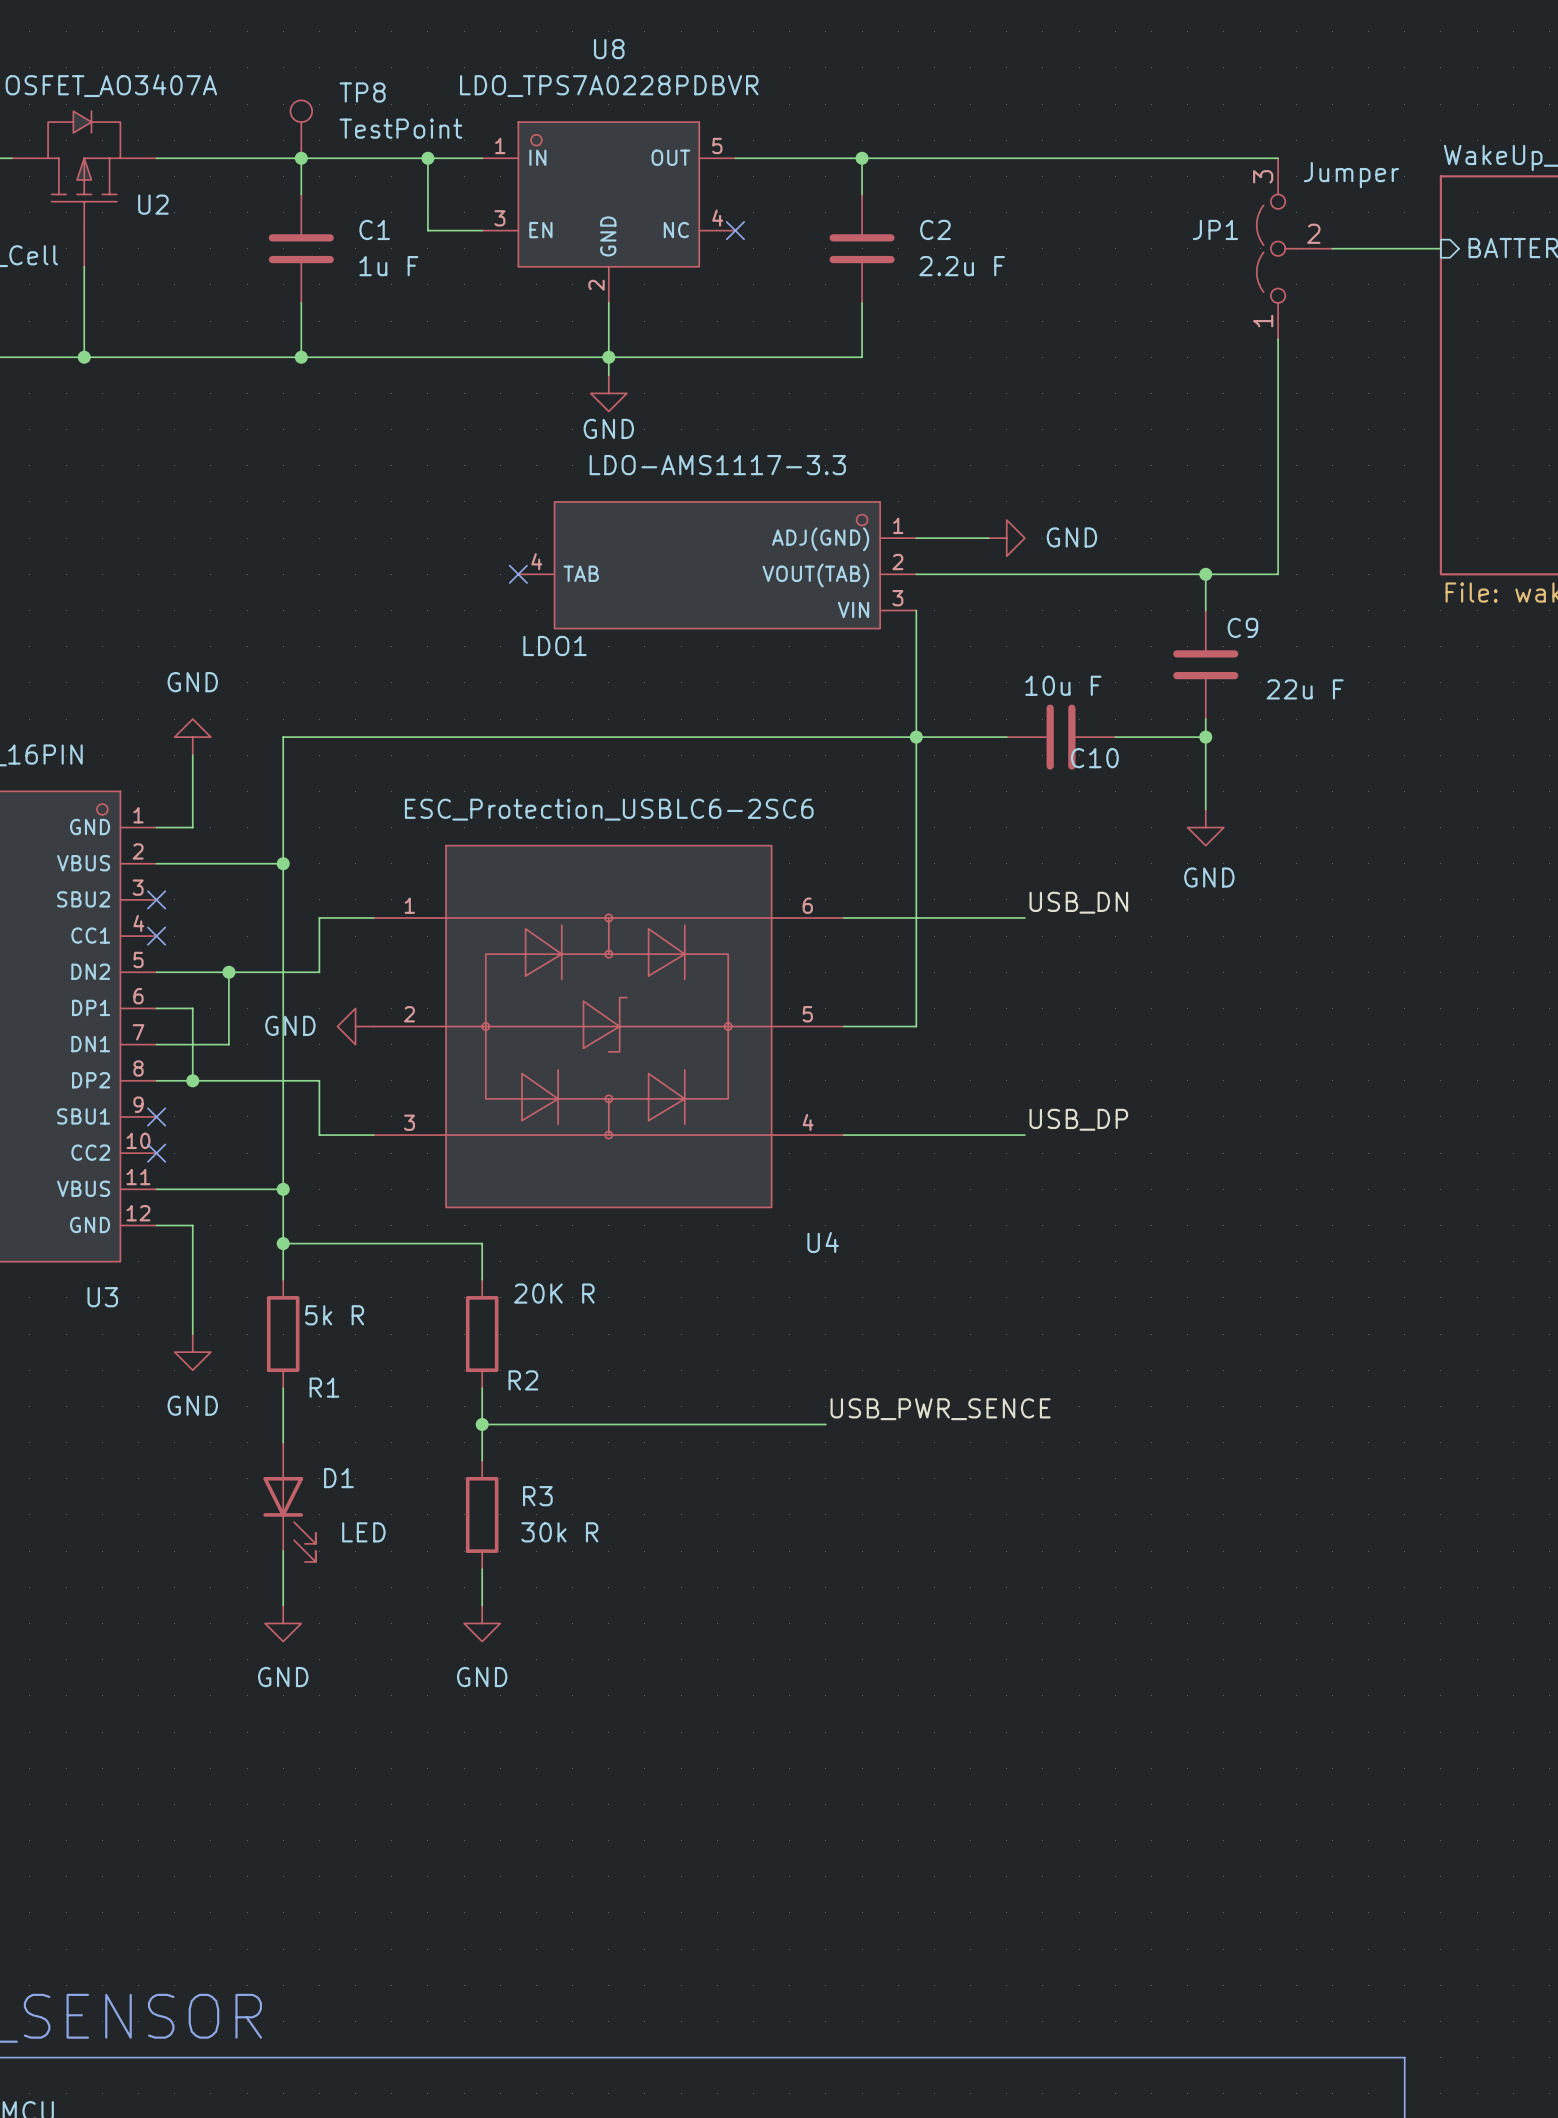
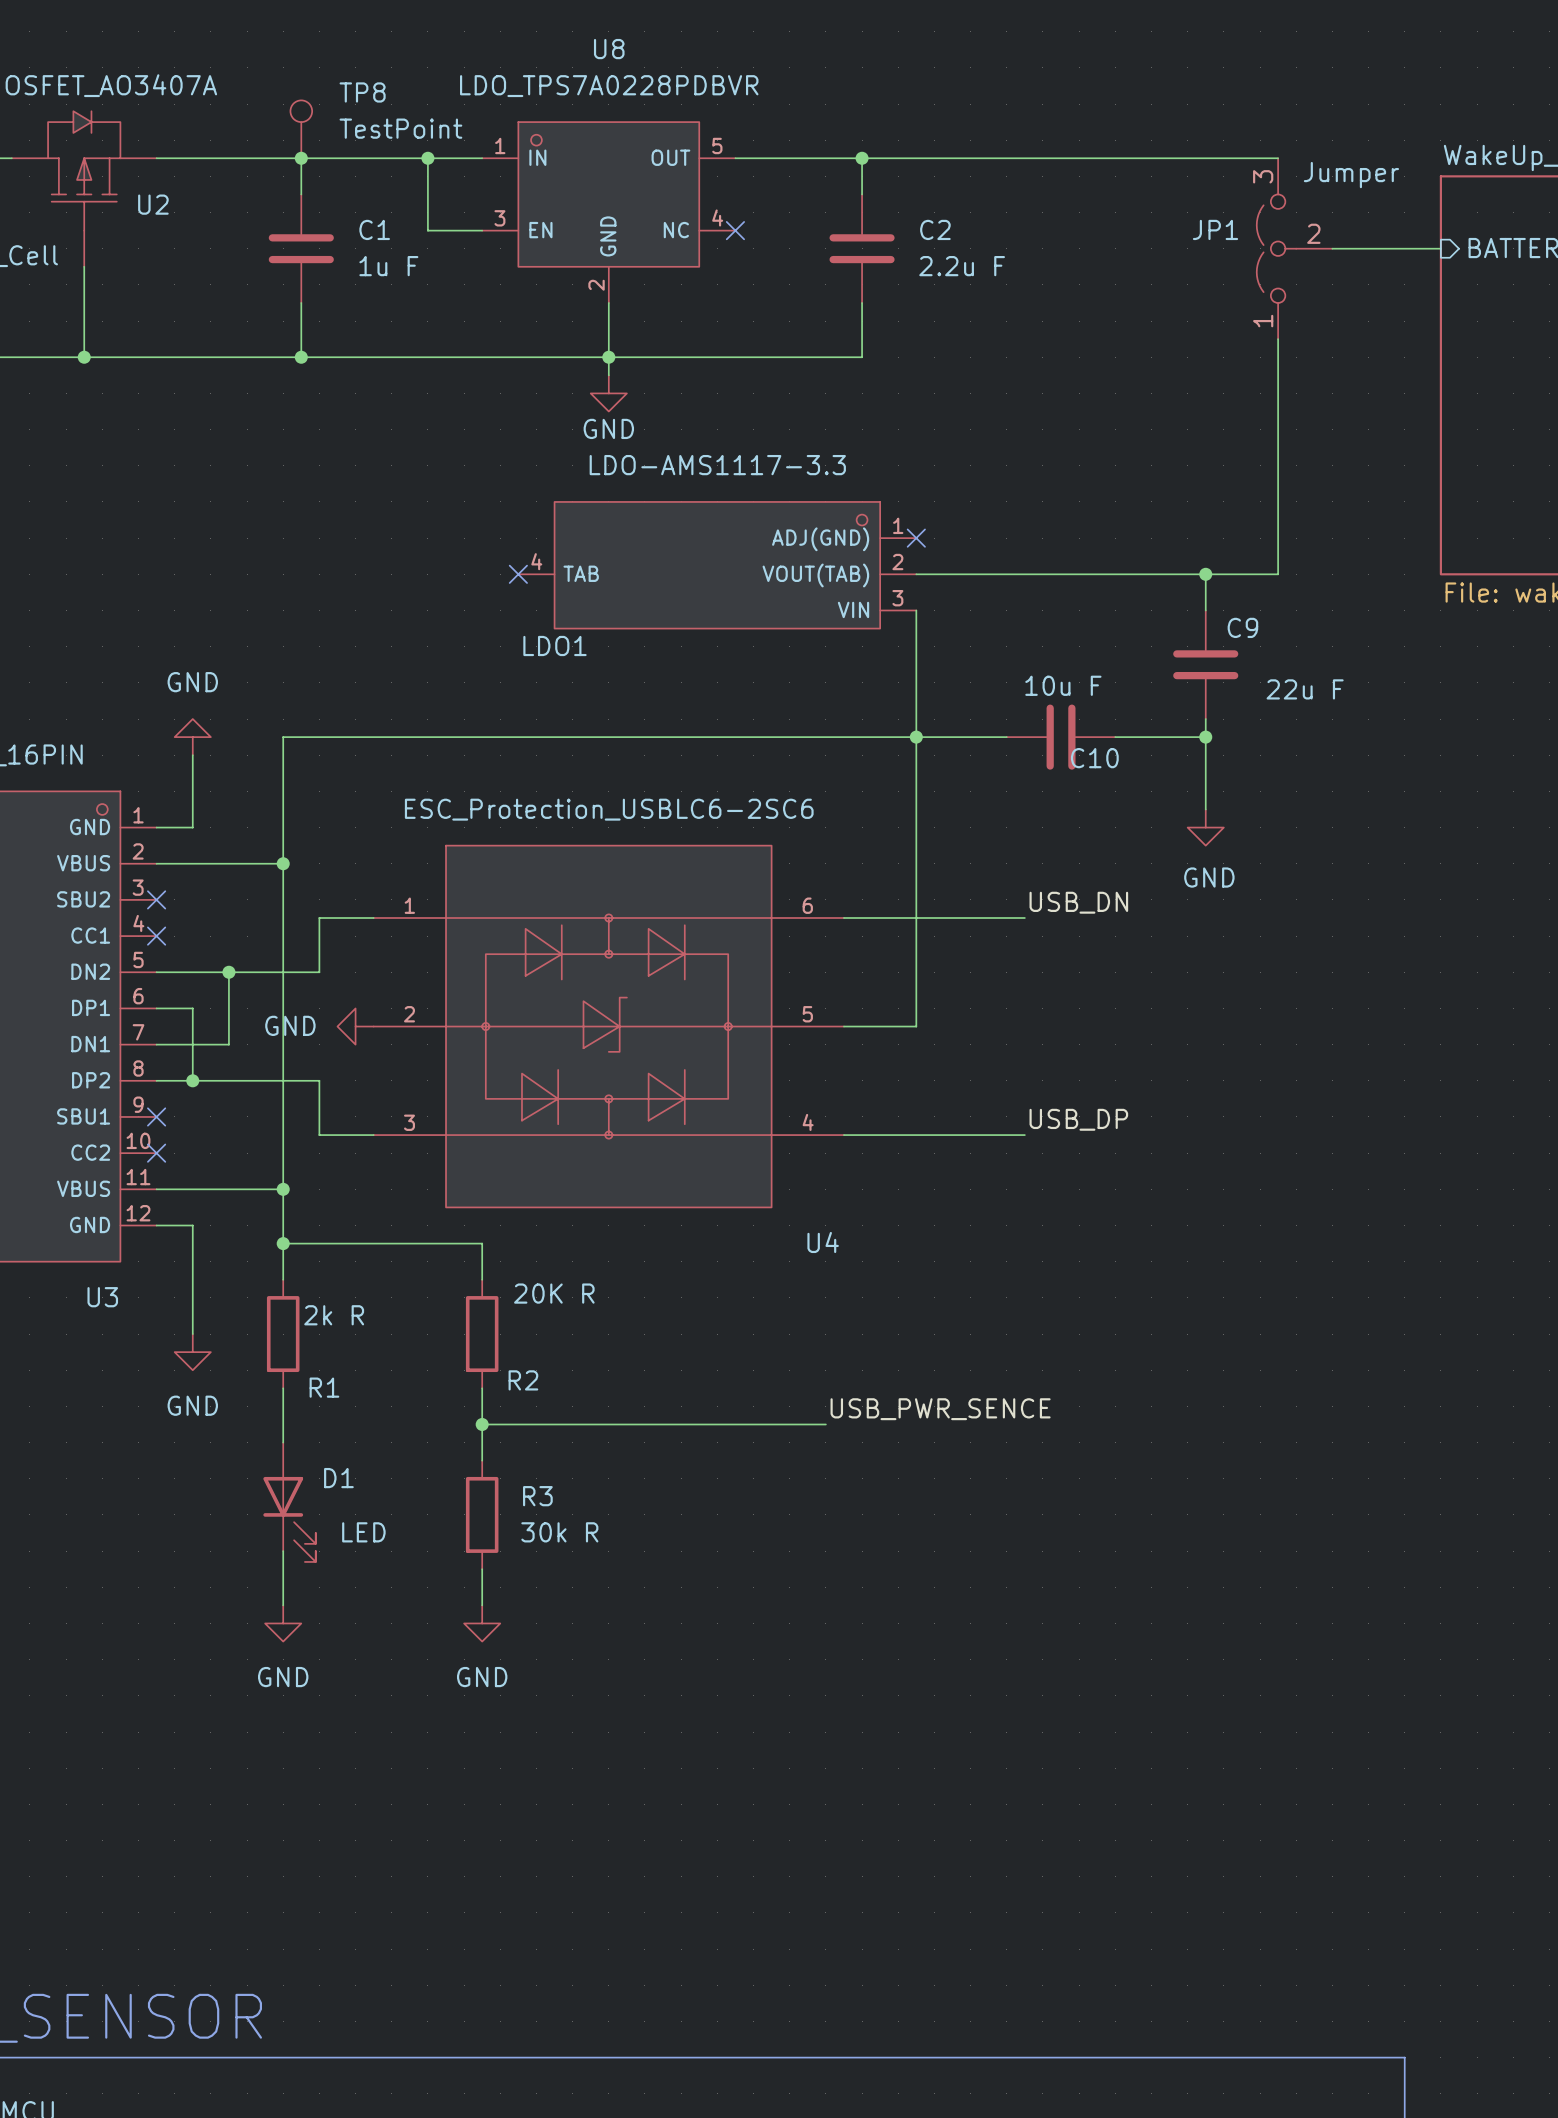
wire: (916, 538) (988, 538) -> none
no-connect mark: none -> (916, 538)
power symbol: GND (1006, 538) -> none
R1 value: 5k R (334, 1315) -> 2k R (334, 1315)

